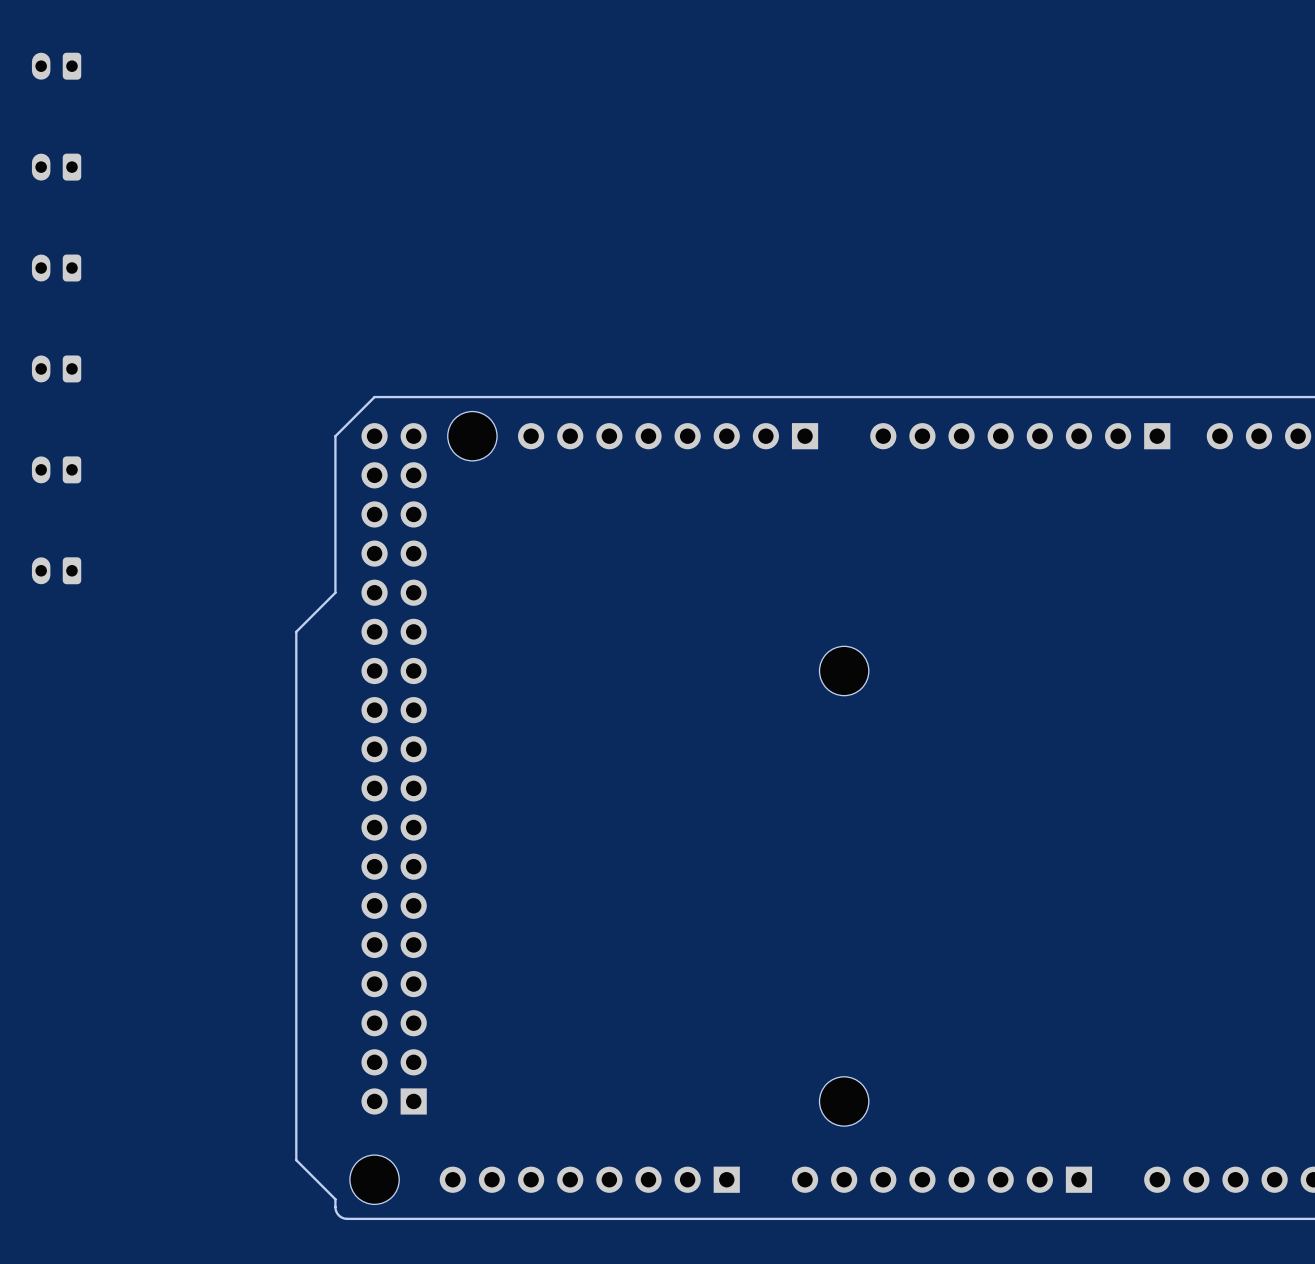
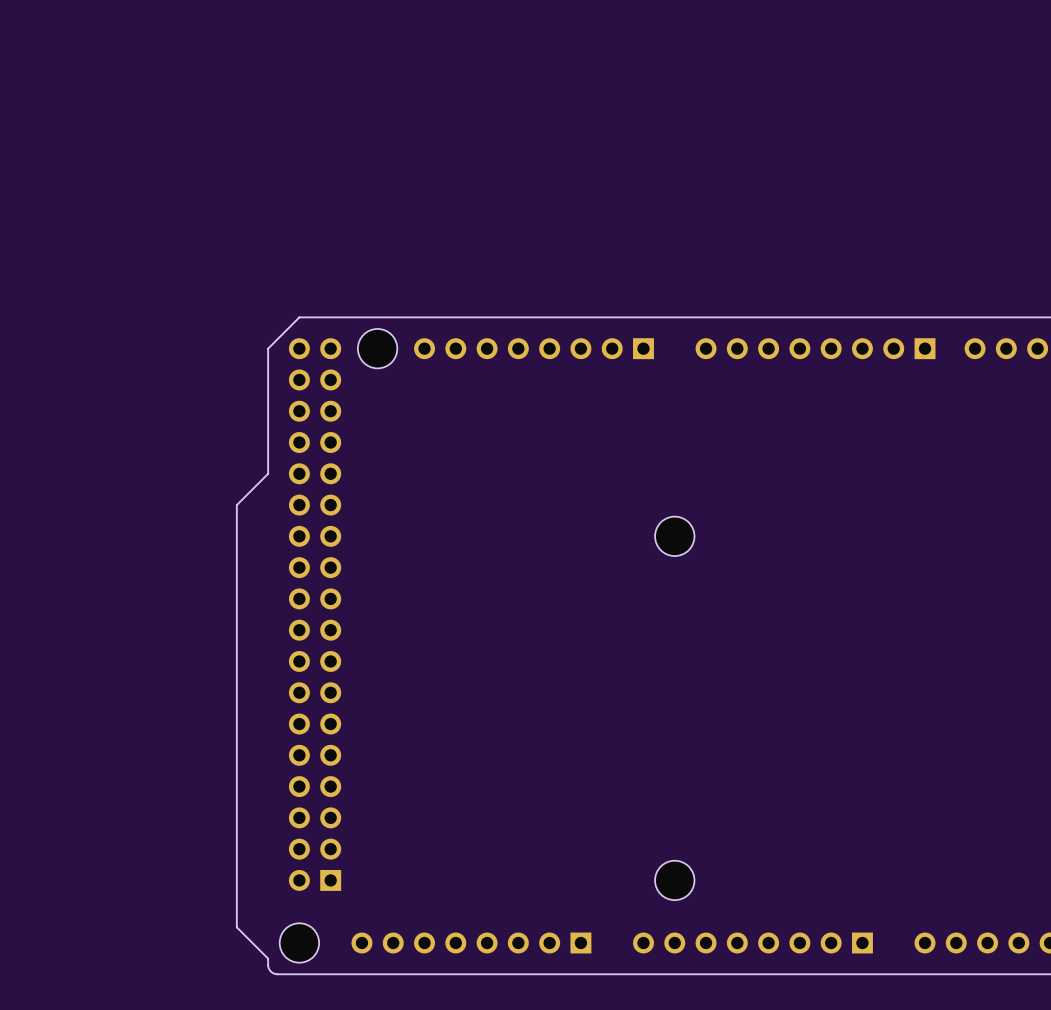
part: (56, 66) -> none
part: (56, 167) -> none
part: (56, 268) -> none
part: (56, 368) -> none
part: (56, 469) -> none
part: (56, 570) -> none

